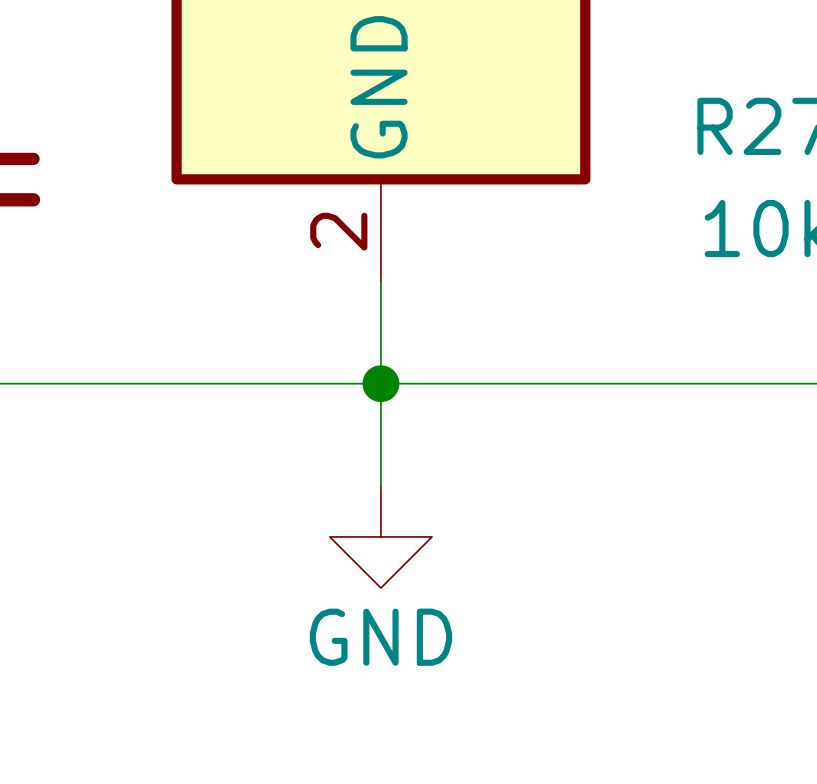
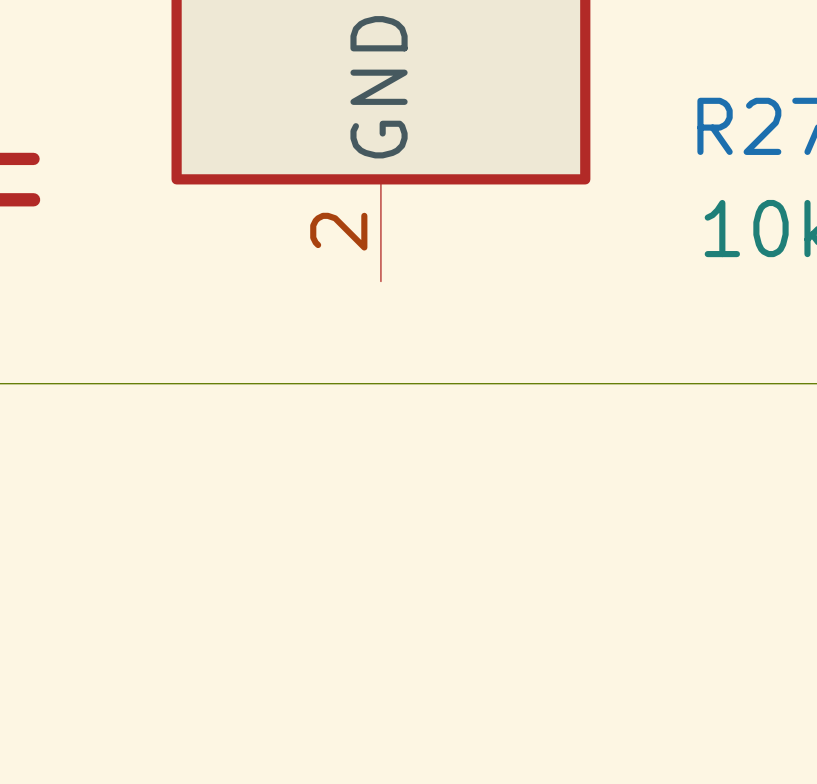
wire: (380, 281) (380, 485) -> none
junction: (380, 383) -> none
power symbol: GND (380, 536) -> none

